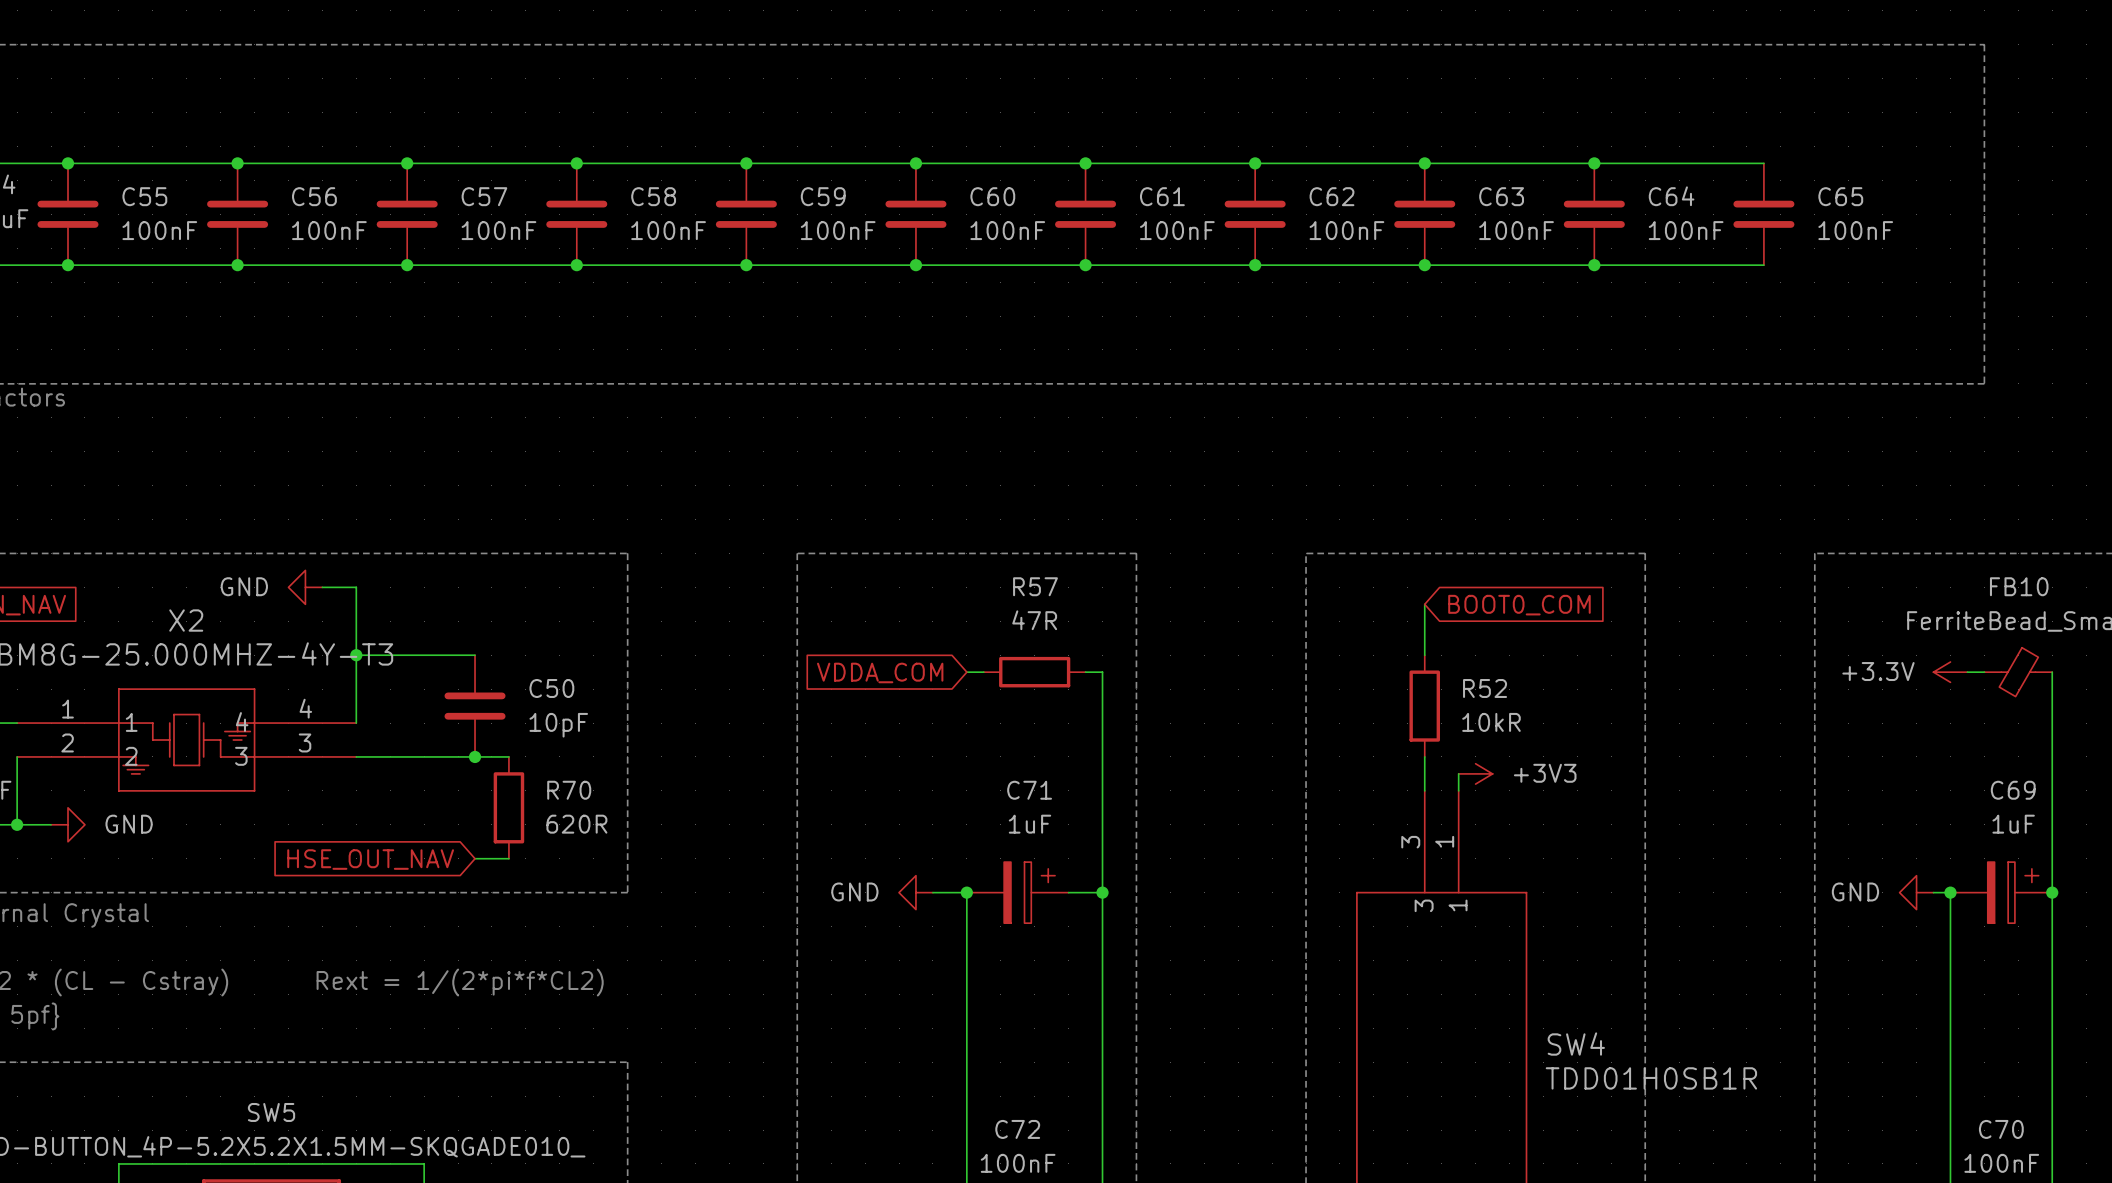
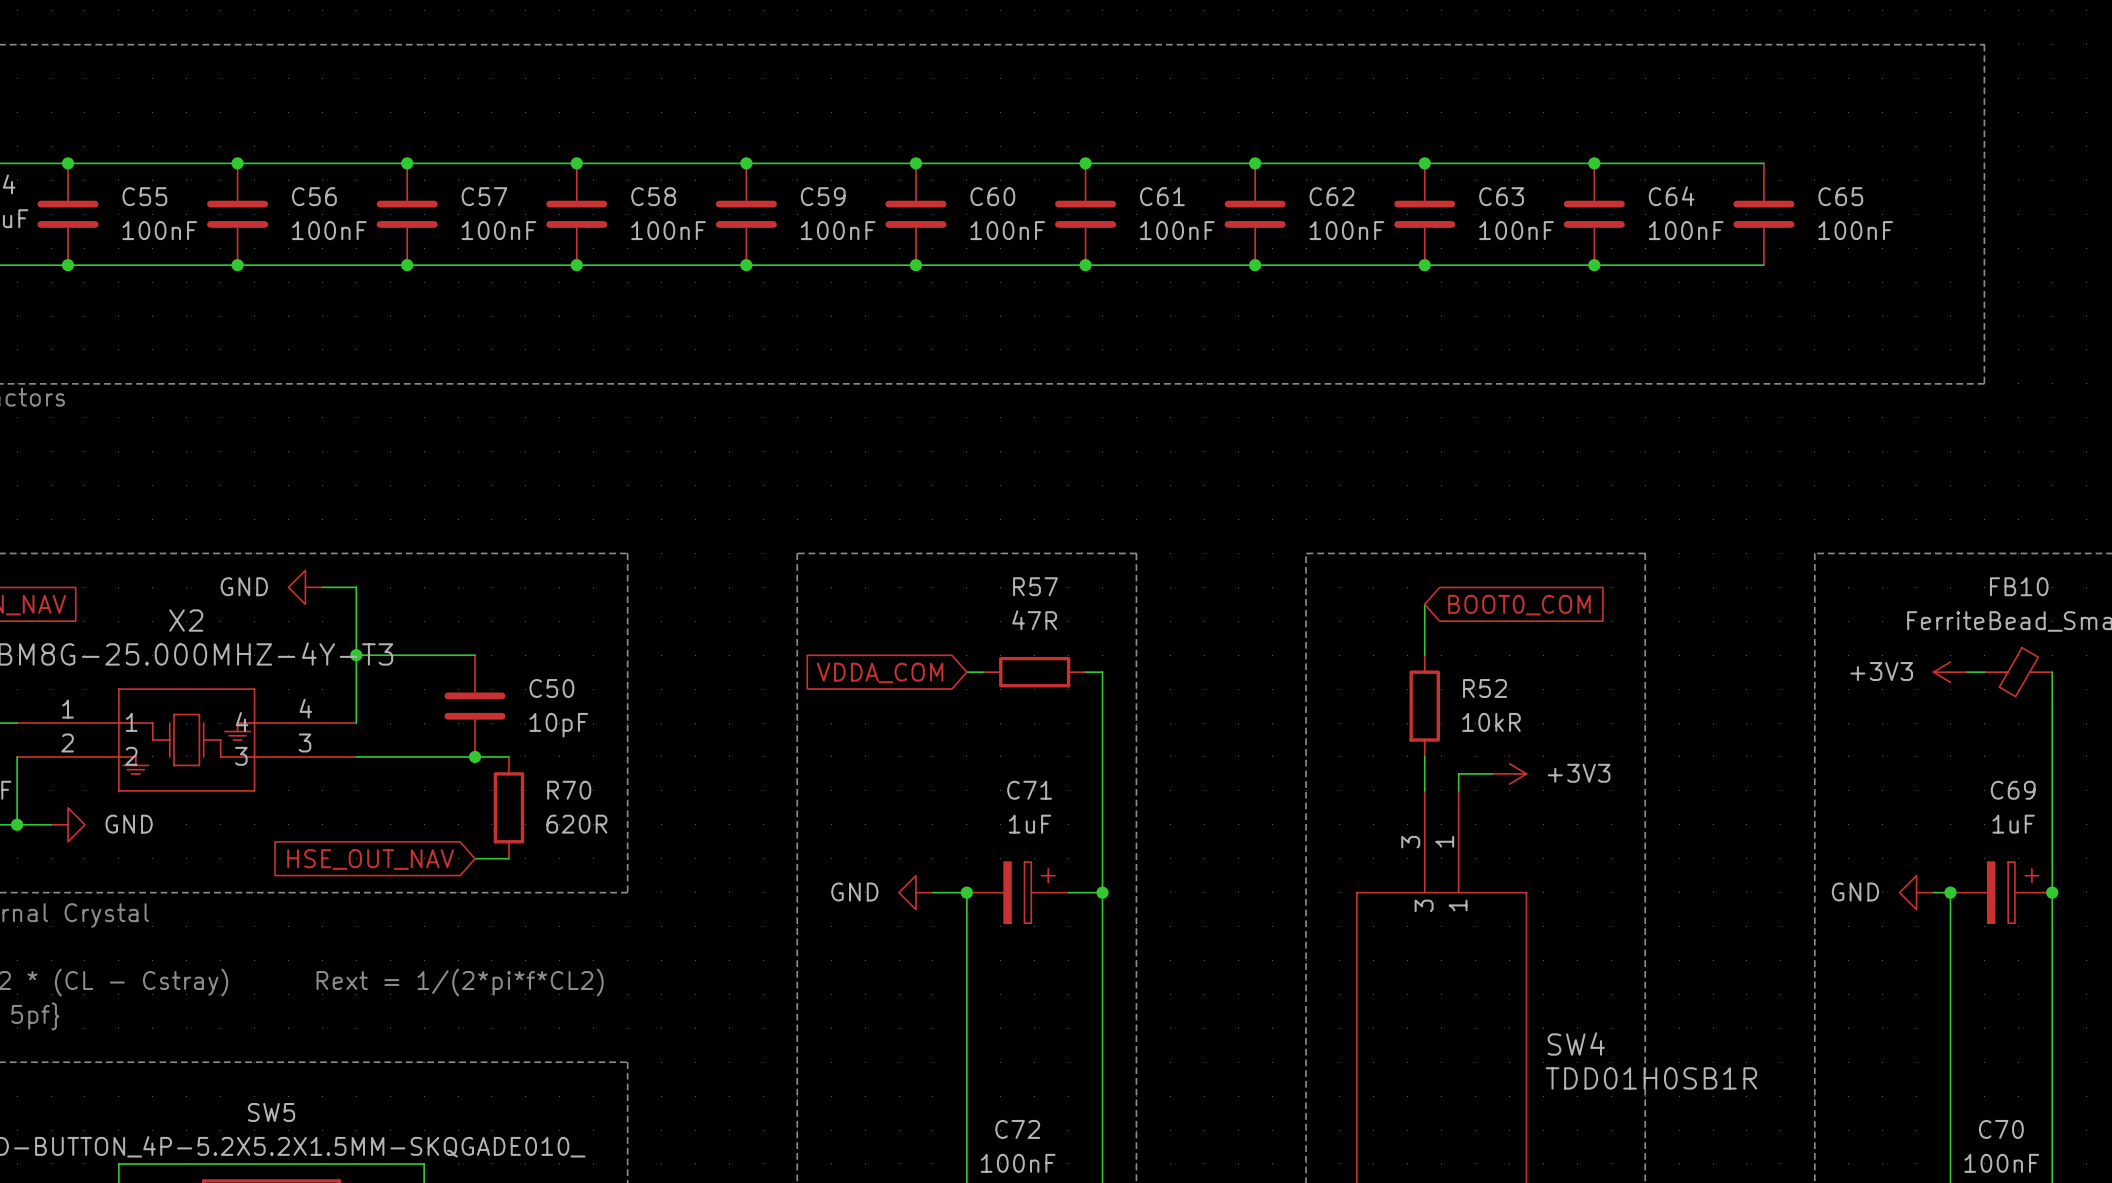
power symbol: +3.3V (1950, 672) -> +3V3 (1950, 672)
power symbol position: +3V3 (1475, 773) -> +3V3 (1509, 773)

